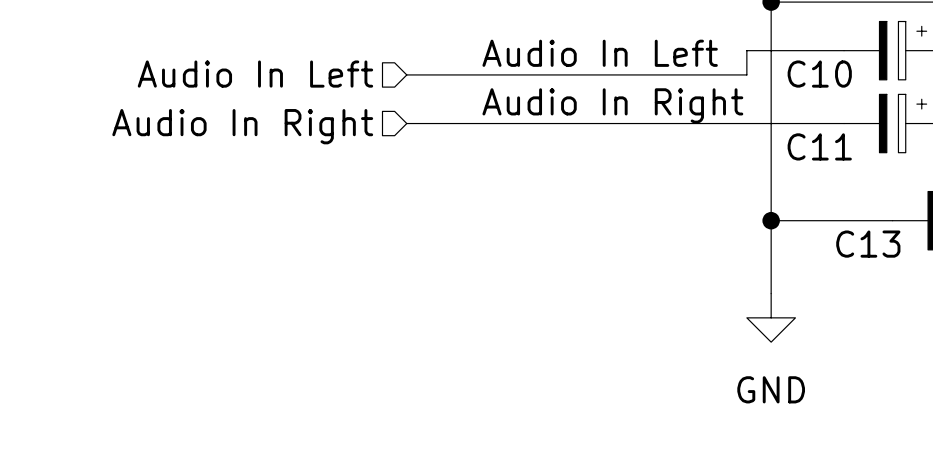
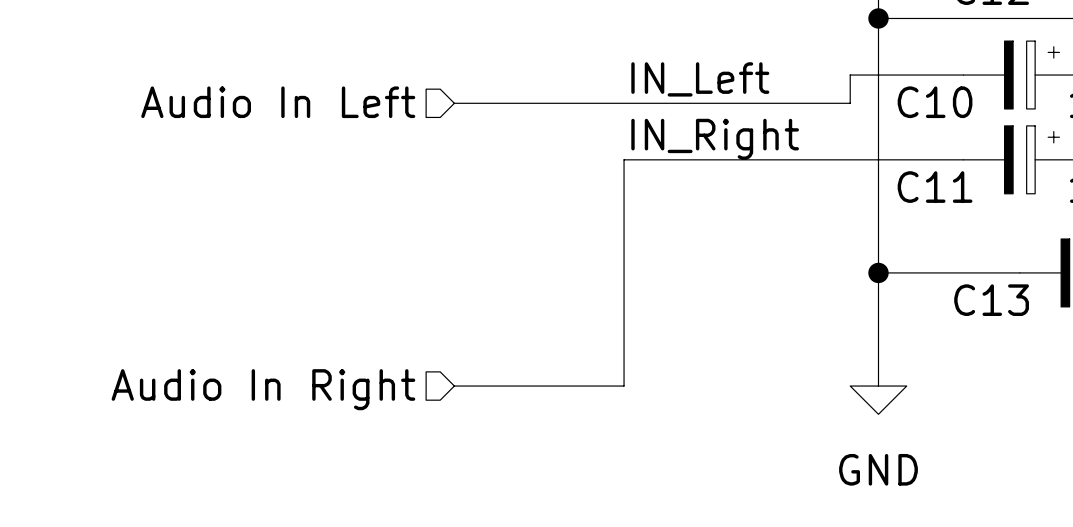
label: Audio In Left (600, 53) -> none
label: none -> IN_Left (700, 79)
label: Audio In Right (612, 105) -> none
label: none -> IN_Right (715, 139)
wire: (406, 123) (552, 123) -> (454, 386) (624, 386) (624, 159)
hierarchical label position: Audio In Right (242, 126) -> Audio In Right (263, 389)

